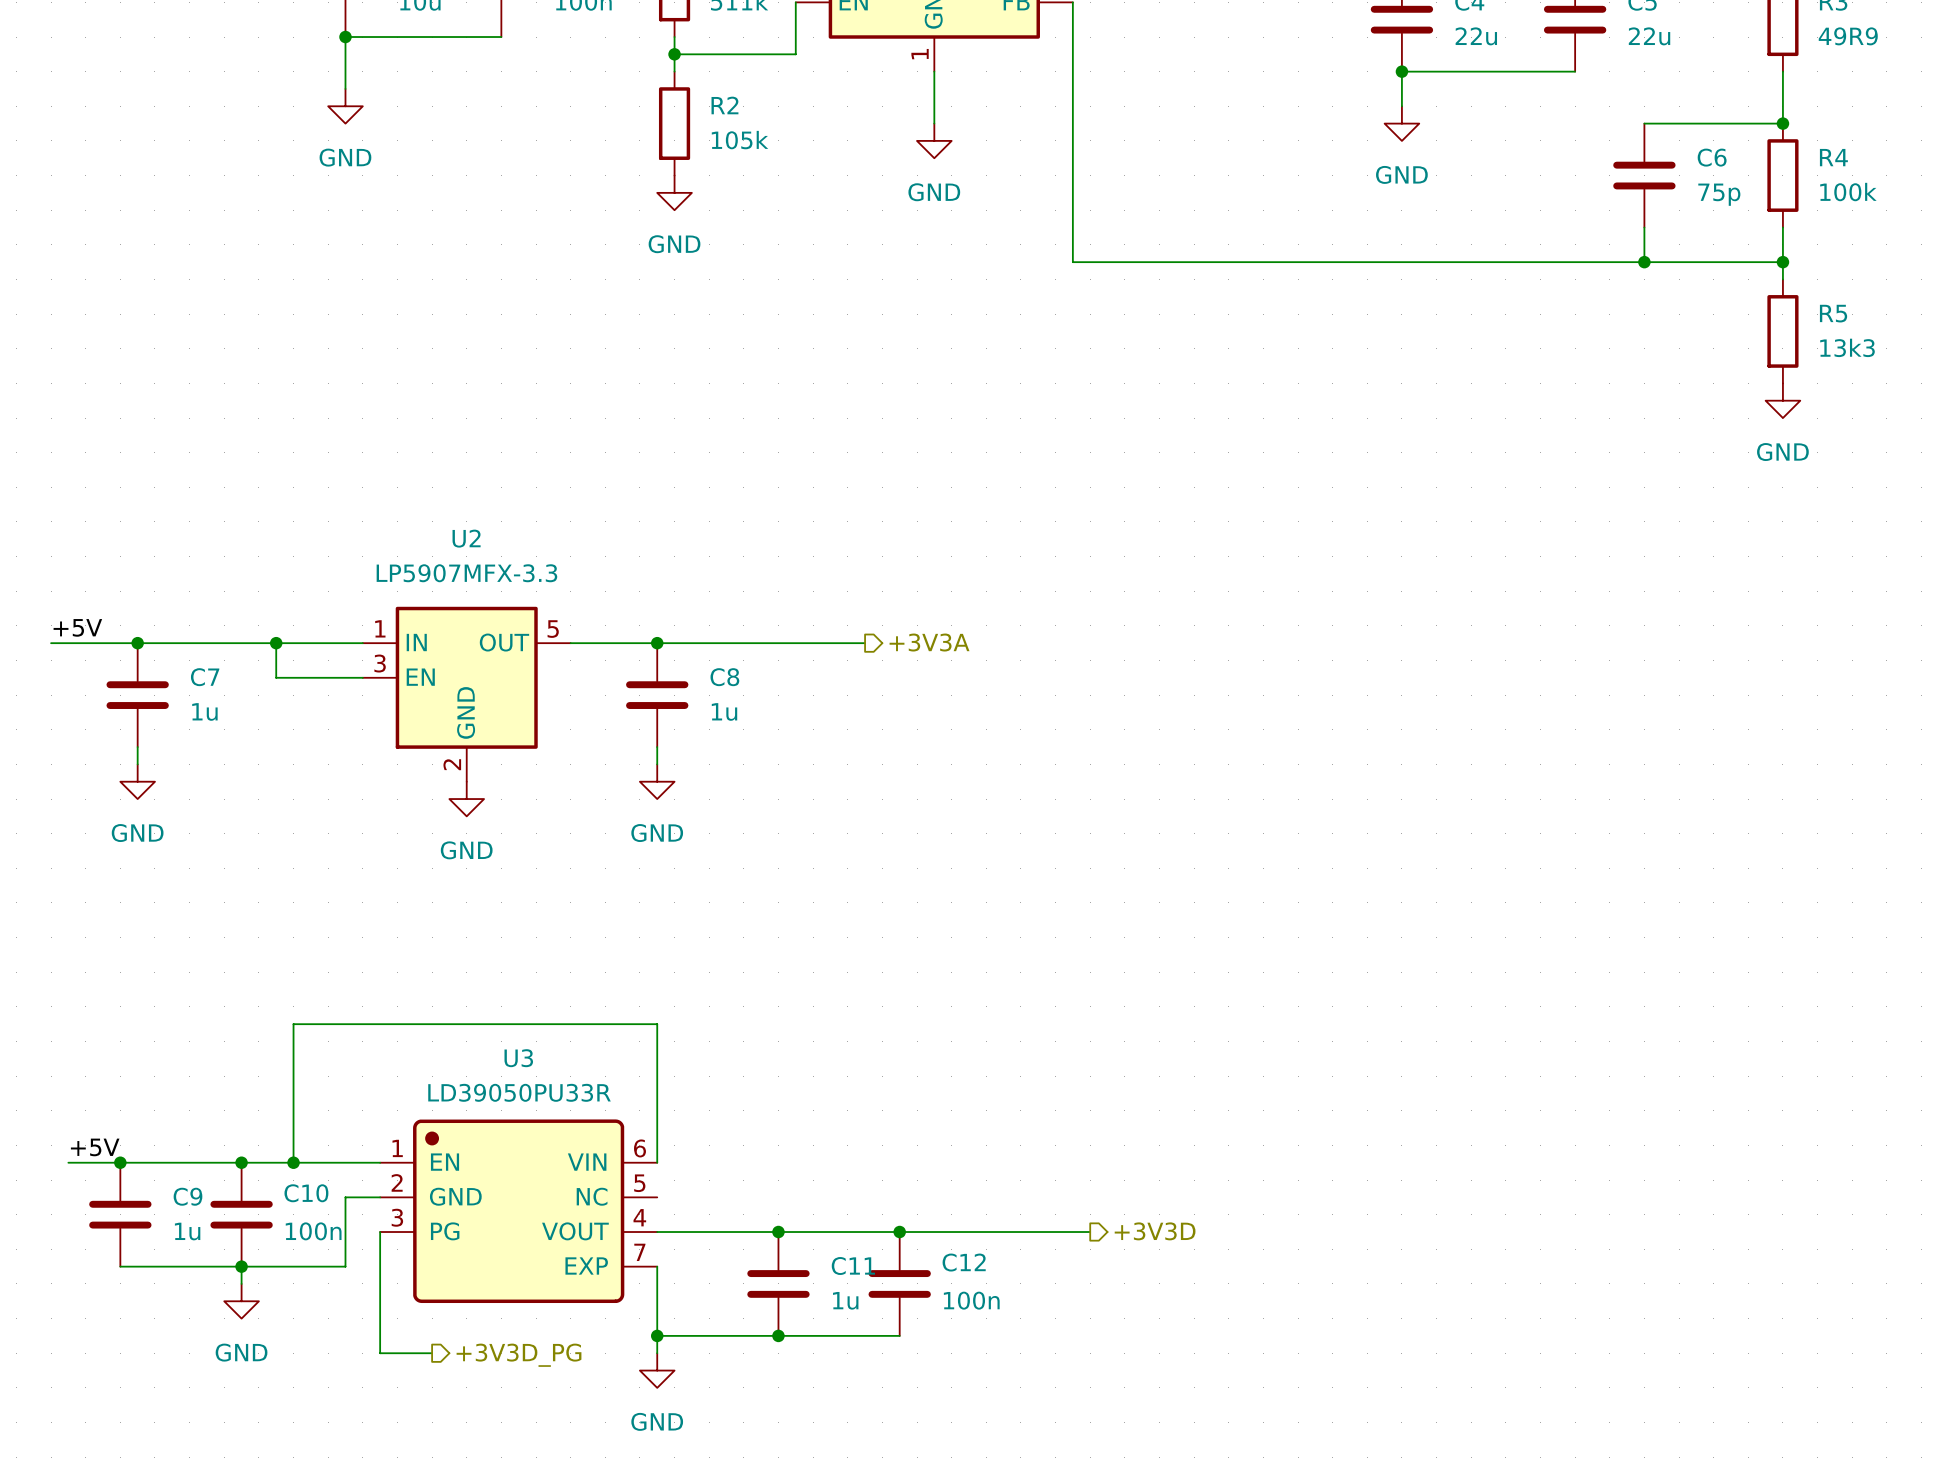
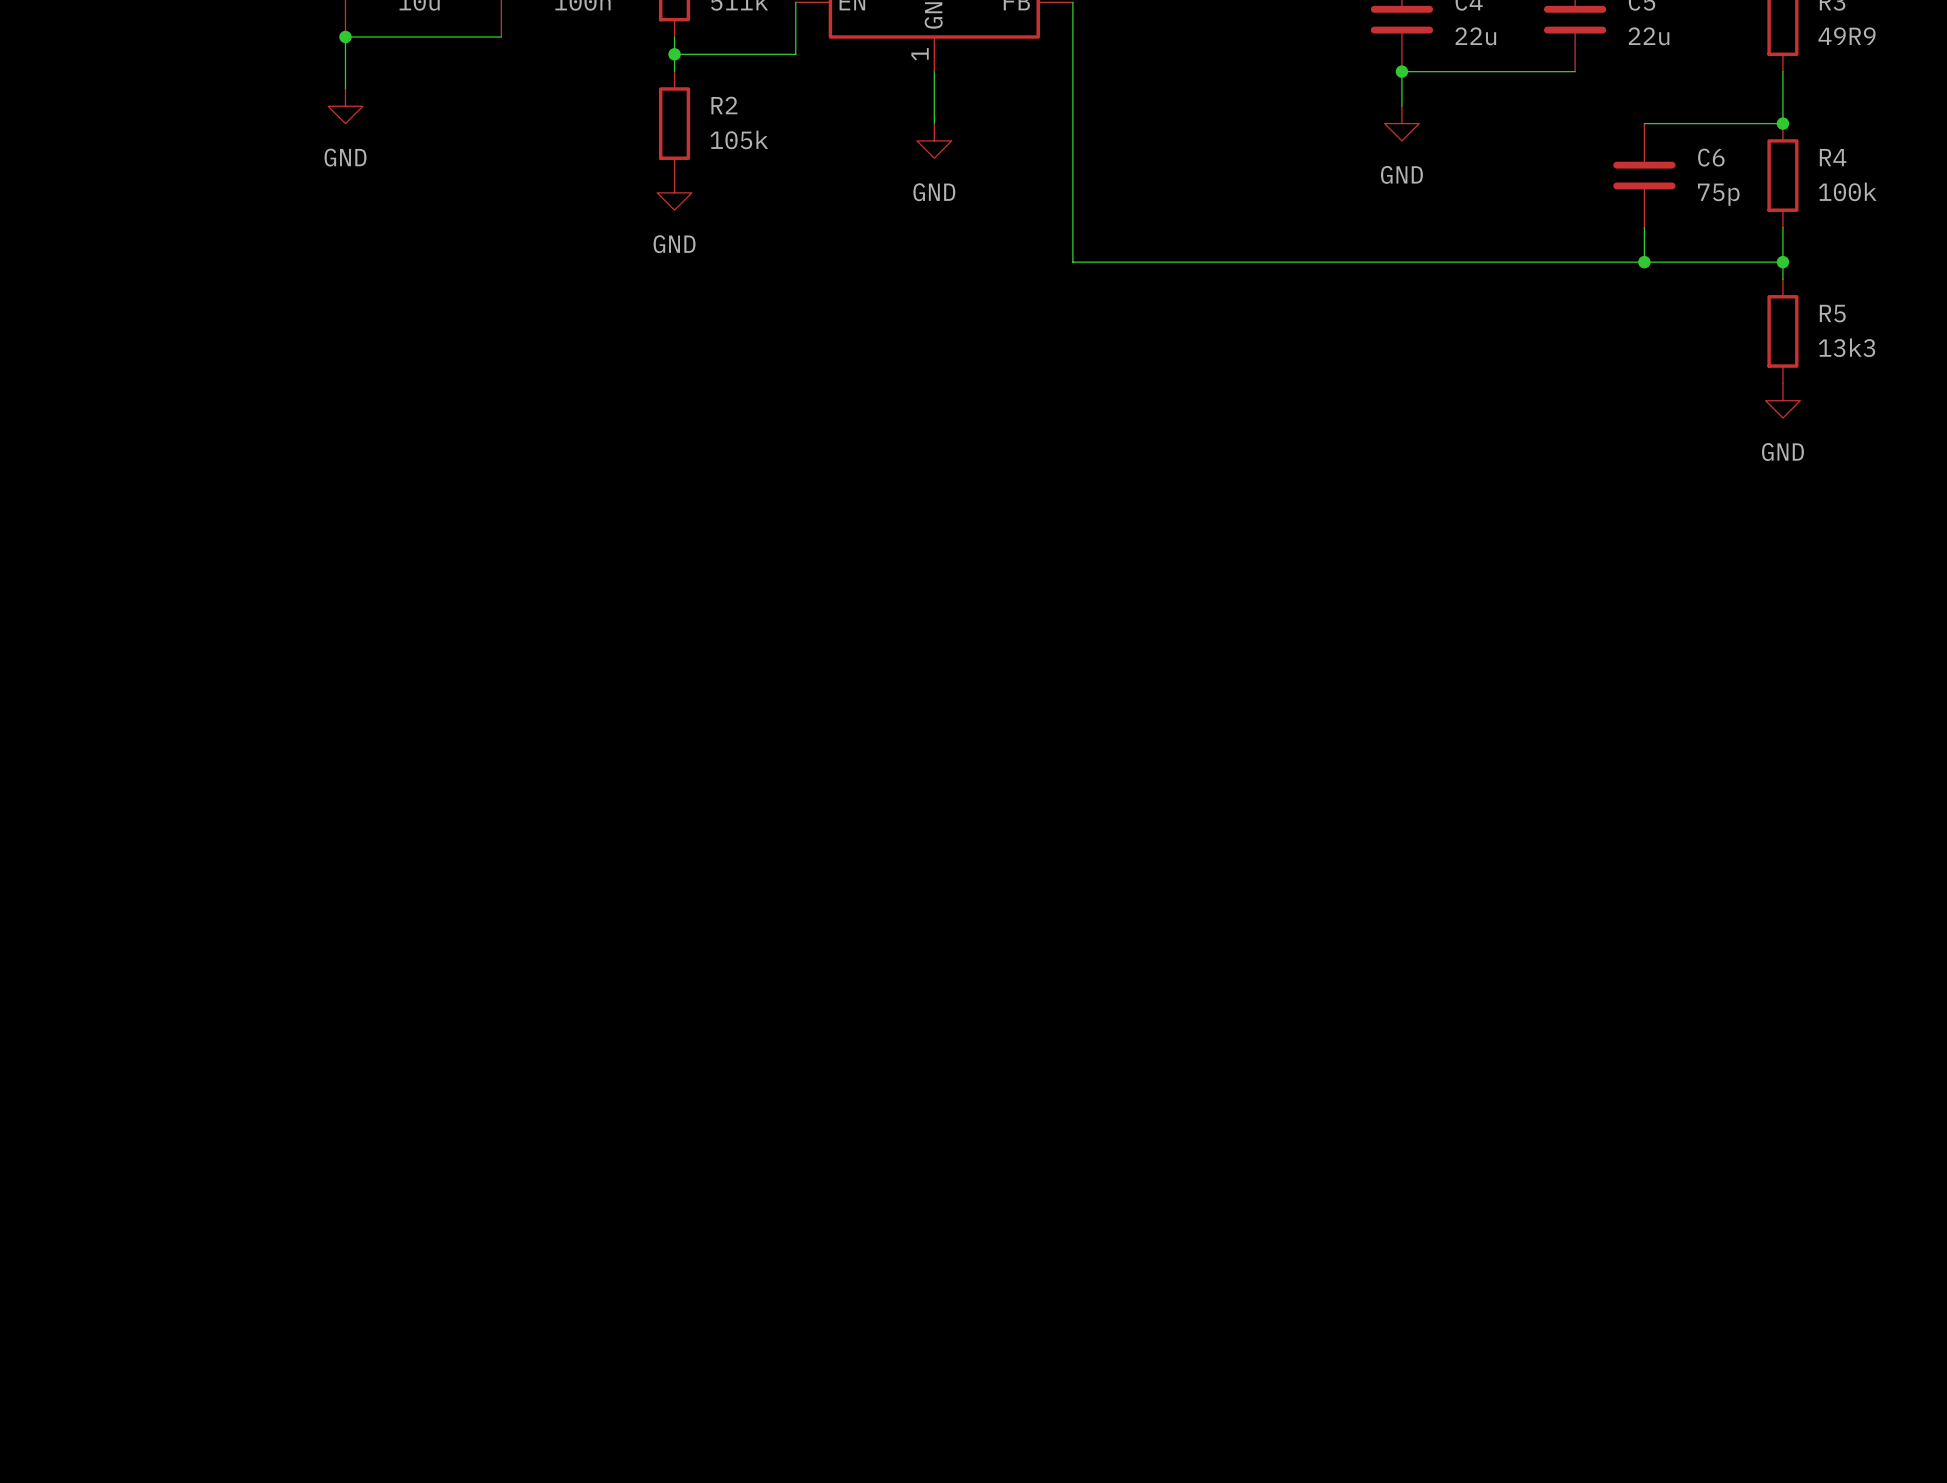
label: +5V (77, 627) -> none
hierarchical label: +3V3A (929, 642) -> none
wire: (51, 643) (362, 643) -> none
junction: (137, 643) -> none
wire: (276, 643) (276, 677) (362, 677) -> none
junction: (276, 643) -> none
wire: (570, 643) (865, 643) -> none
junction: (657, 643) -> none
U2: LP5907MFX-3.3 (466, 694) -> none
C7: 1u (137, 695) -> none
C8: 1u (657, 695) -> none
wire: (137, 747) (137, 764) -> none
wire: (657, 747) (657, 764) -> none
power symbol: GND (137, 781) -> none
power symbol: GND (657, 781) -> none
power symbol: GND (466, 799) -> none
label: +5V (95, 1147) -> none
wire: (68, 1162) (380, 1162) -> none
junction: (120, 1162) -> none
junction: (241, 1162) -> none
wire: (293, 1162) (293, 1024) (657, 1024) (657, 1162) -> none
junction: (293, 1162) -> none
wire: (380, 1197) (345, 1197) (345, 1266) (120, 1266) -> none
U3: LD39050PU33R (518, 1211) -> none
C9: 1u (120, 1214) -> none
C10: 100n (241, 1214) -> none
hierarchical label: +3V3D (1155, 1231) -> none
wire: (380, 1232) (380, 1353) (432, 1353) -> none
wire: (657, 1232) (1090, 1232) -> none
junction: (778, 1232) -> none
junction: (899, 1232) -> none
wire: (241, 1266) (241, 1283) -> none
junction: (241, 1266) -> none
wire: (657, 1266) (657, 1353) -> none
C11: 1u (778, 1283) -> none
C12: 100n (899, 1283) -> none
power symbol: GND (241, 1301) -> none
wire: (657, 1335) (899, 1335) -> none
junction: (657, 1335) -> none
junction: (778, 1335) -> none
hierarchical label: +3V3D_PG (519, 1355) -> none
power symbol: GND (657, 1370) -> none

